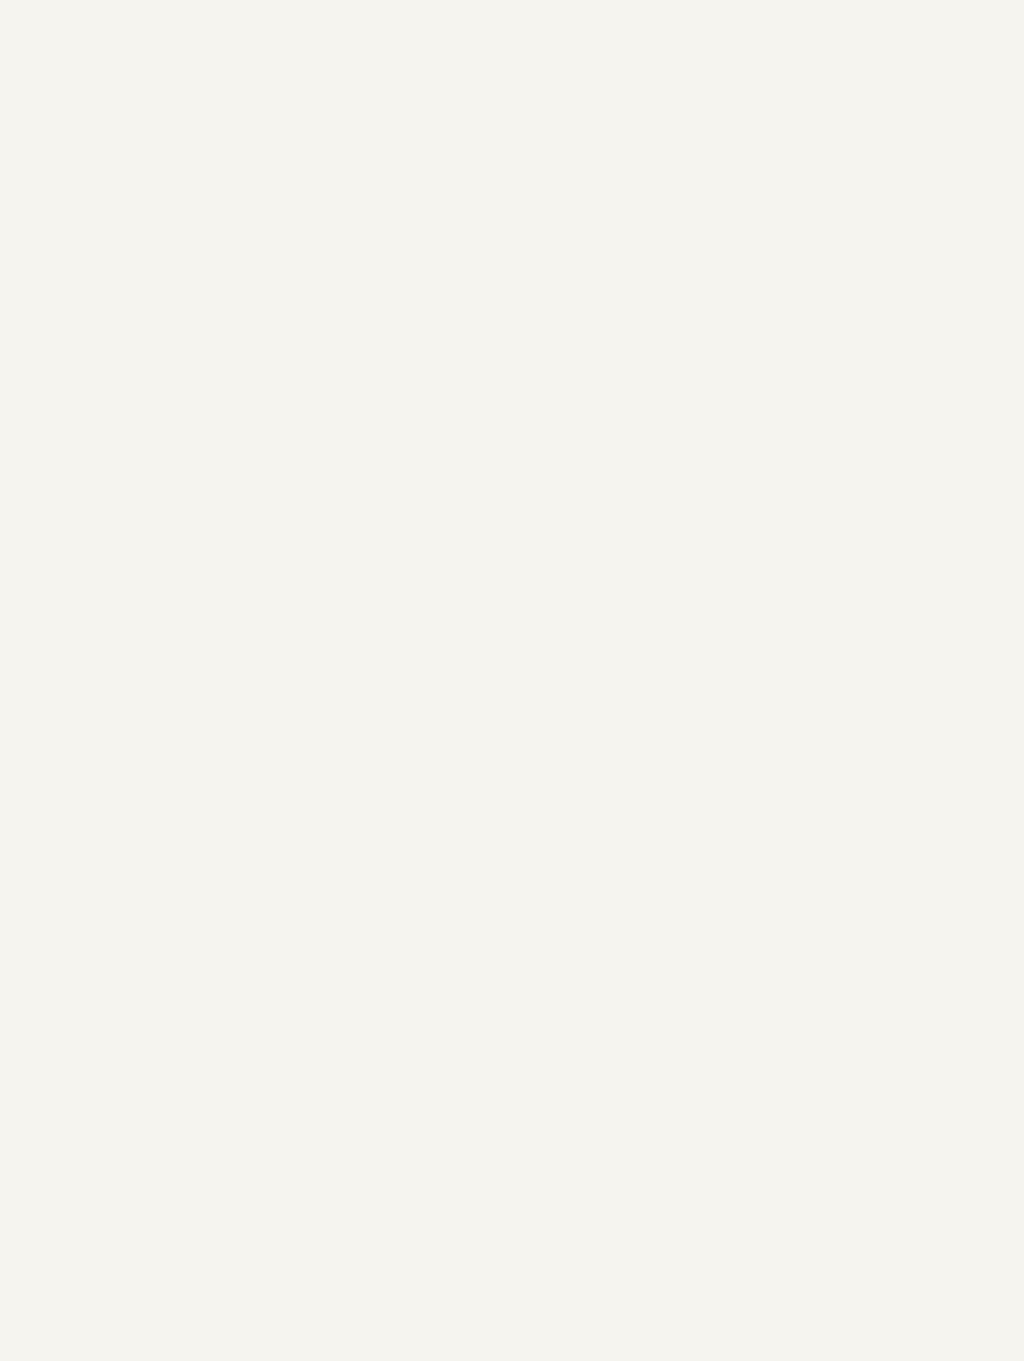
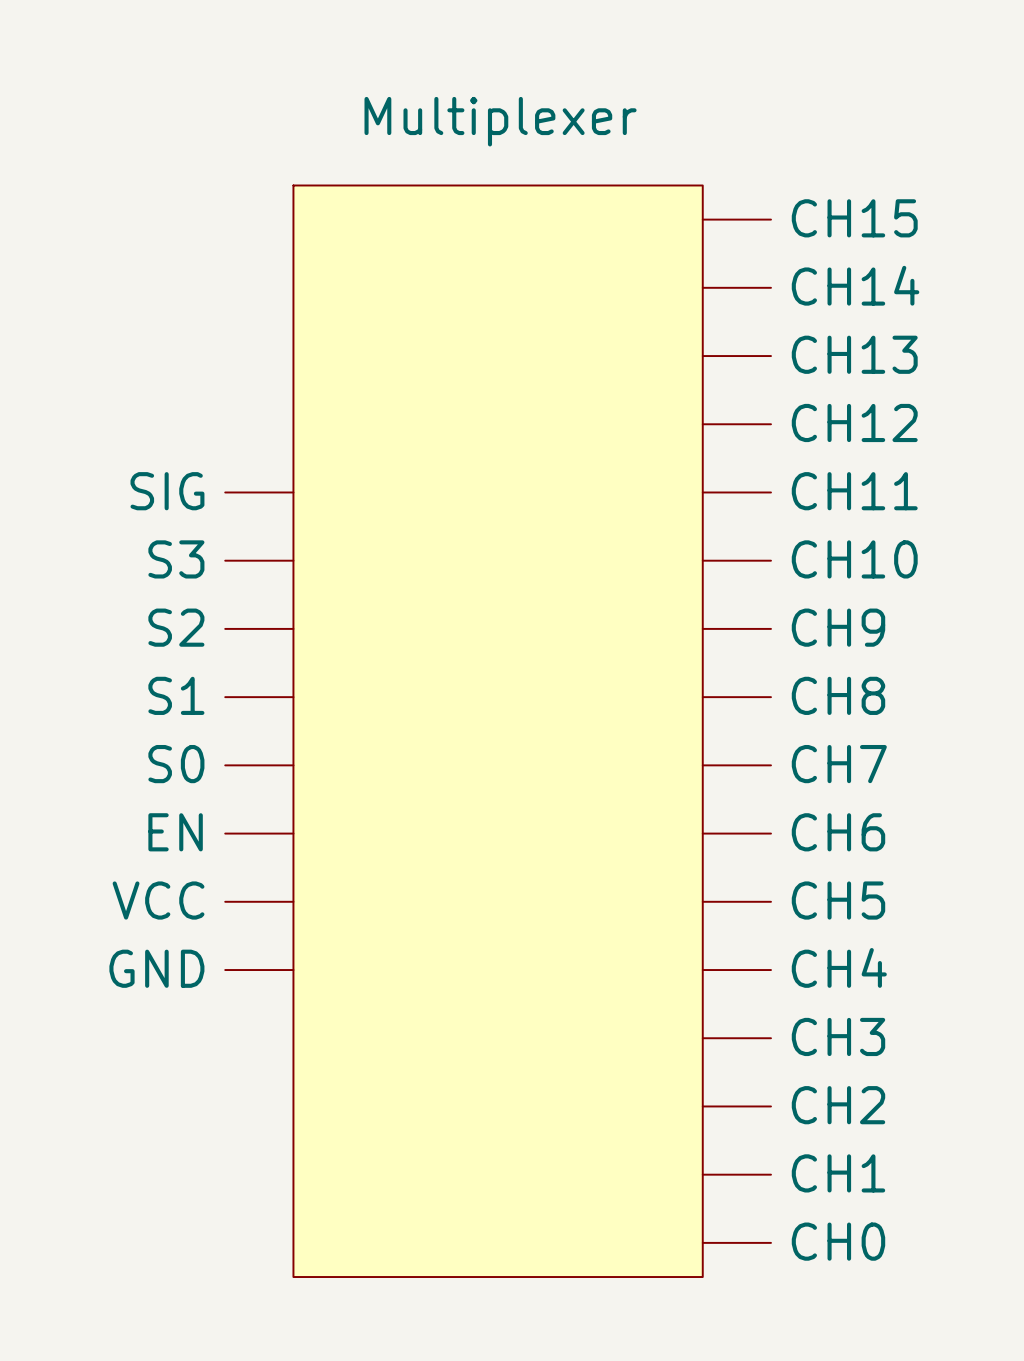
Multiplexer: none -> (498, 731)

